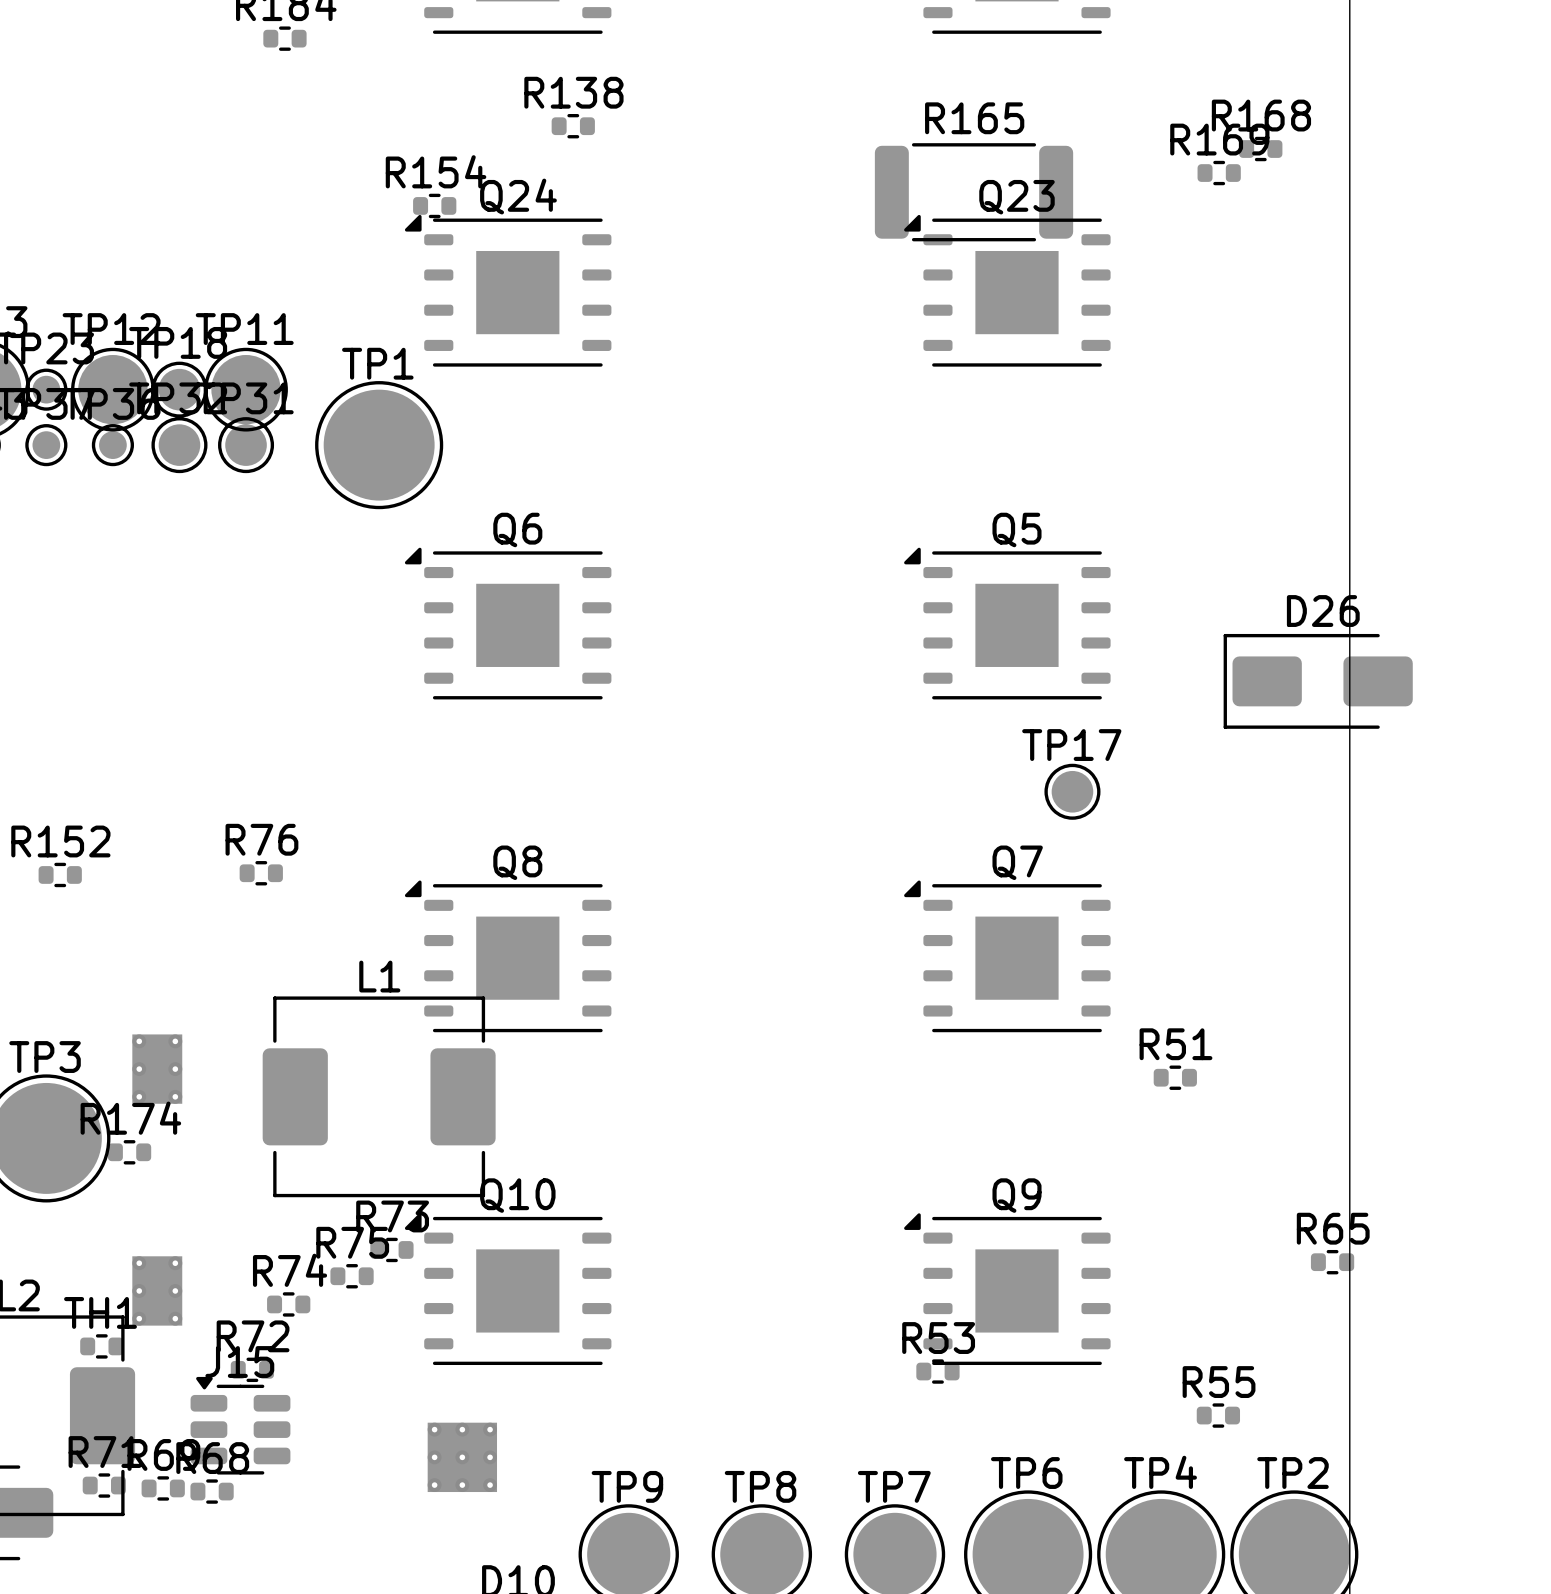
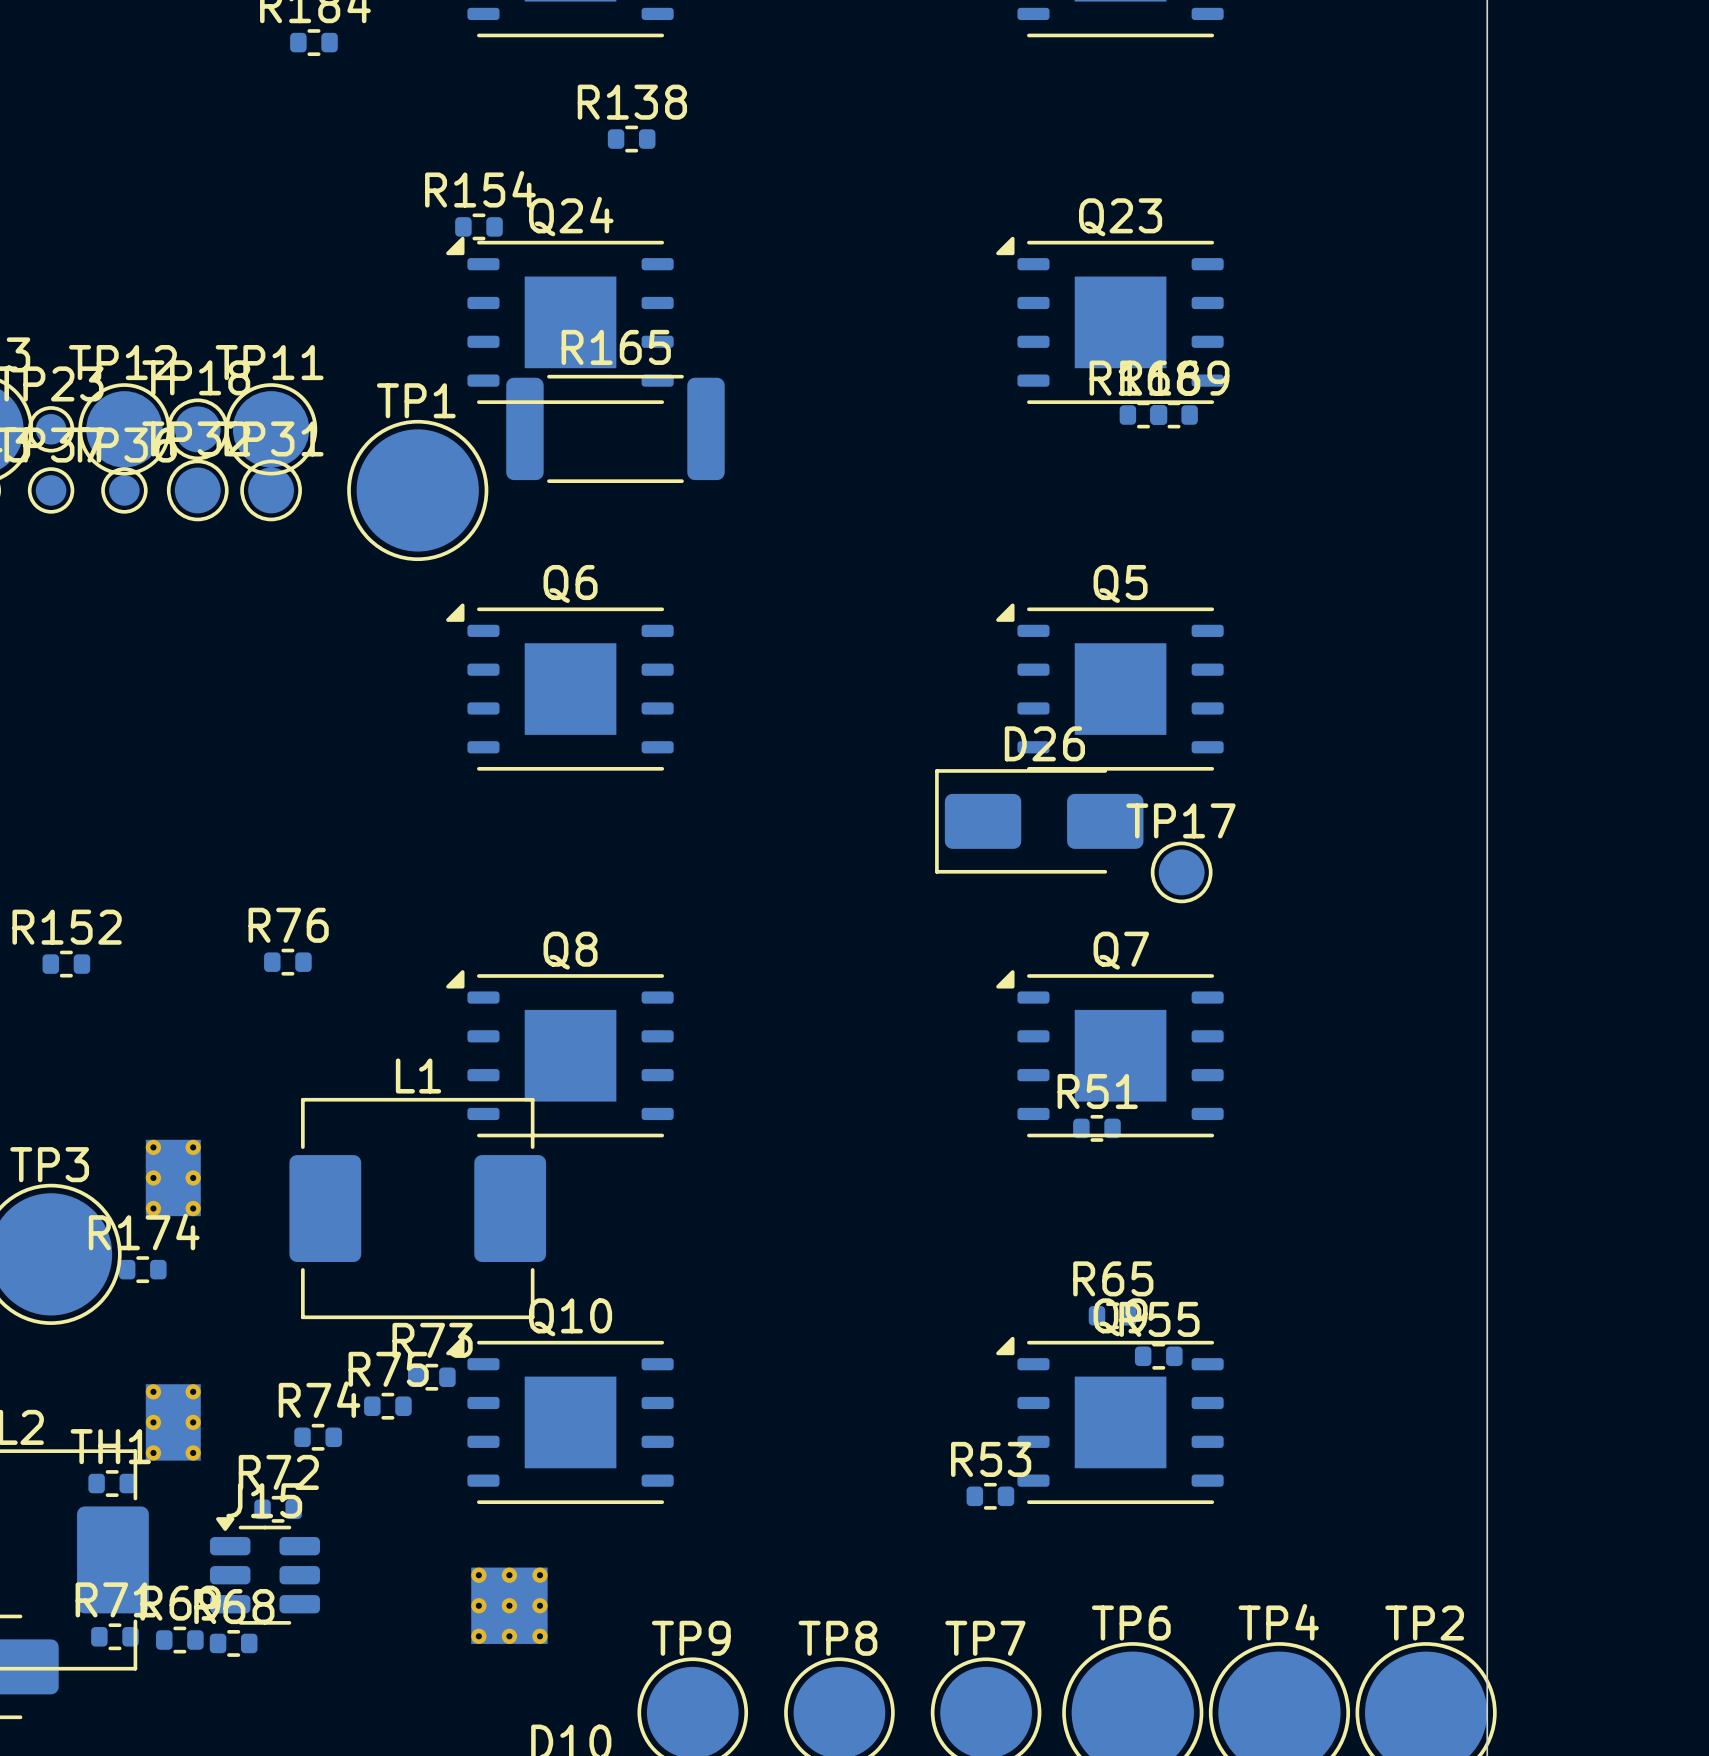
R168 position: (1260, 149) -> (1143, 415)
R169 position: (1219, 173) -> (1174, 415)
R165 position: (974, 192) -> (615, 428)
D26 position: (1318, 681) -> (1039, 821)
R51 position: (1175, 1077) -> (1096, 1128)
R65 position: (1332, 1262) -> (1112, 1315)
R53 position: (937, 1371) -> (990, 1496)
R55 position: (1218, 1415) -> (1158, 1356)

